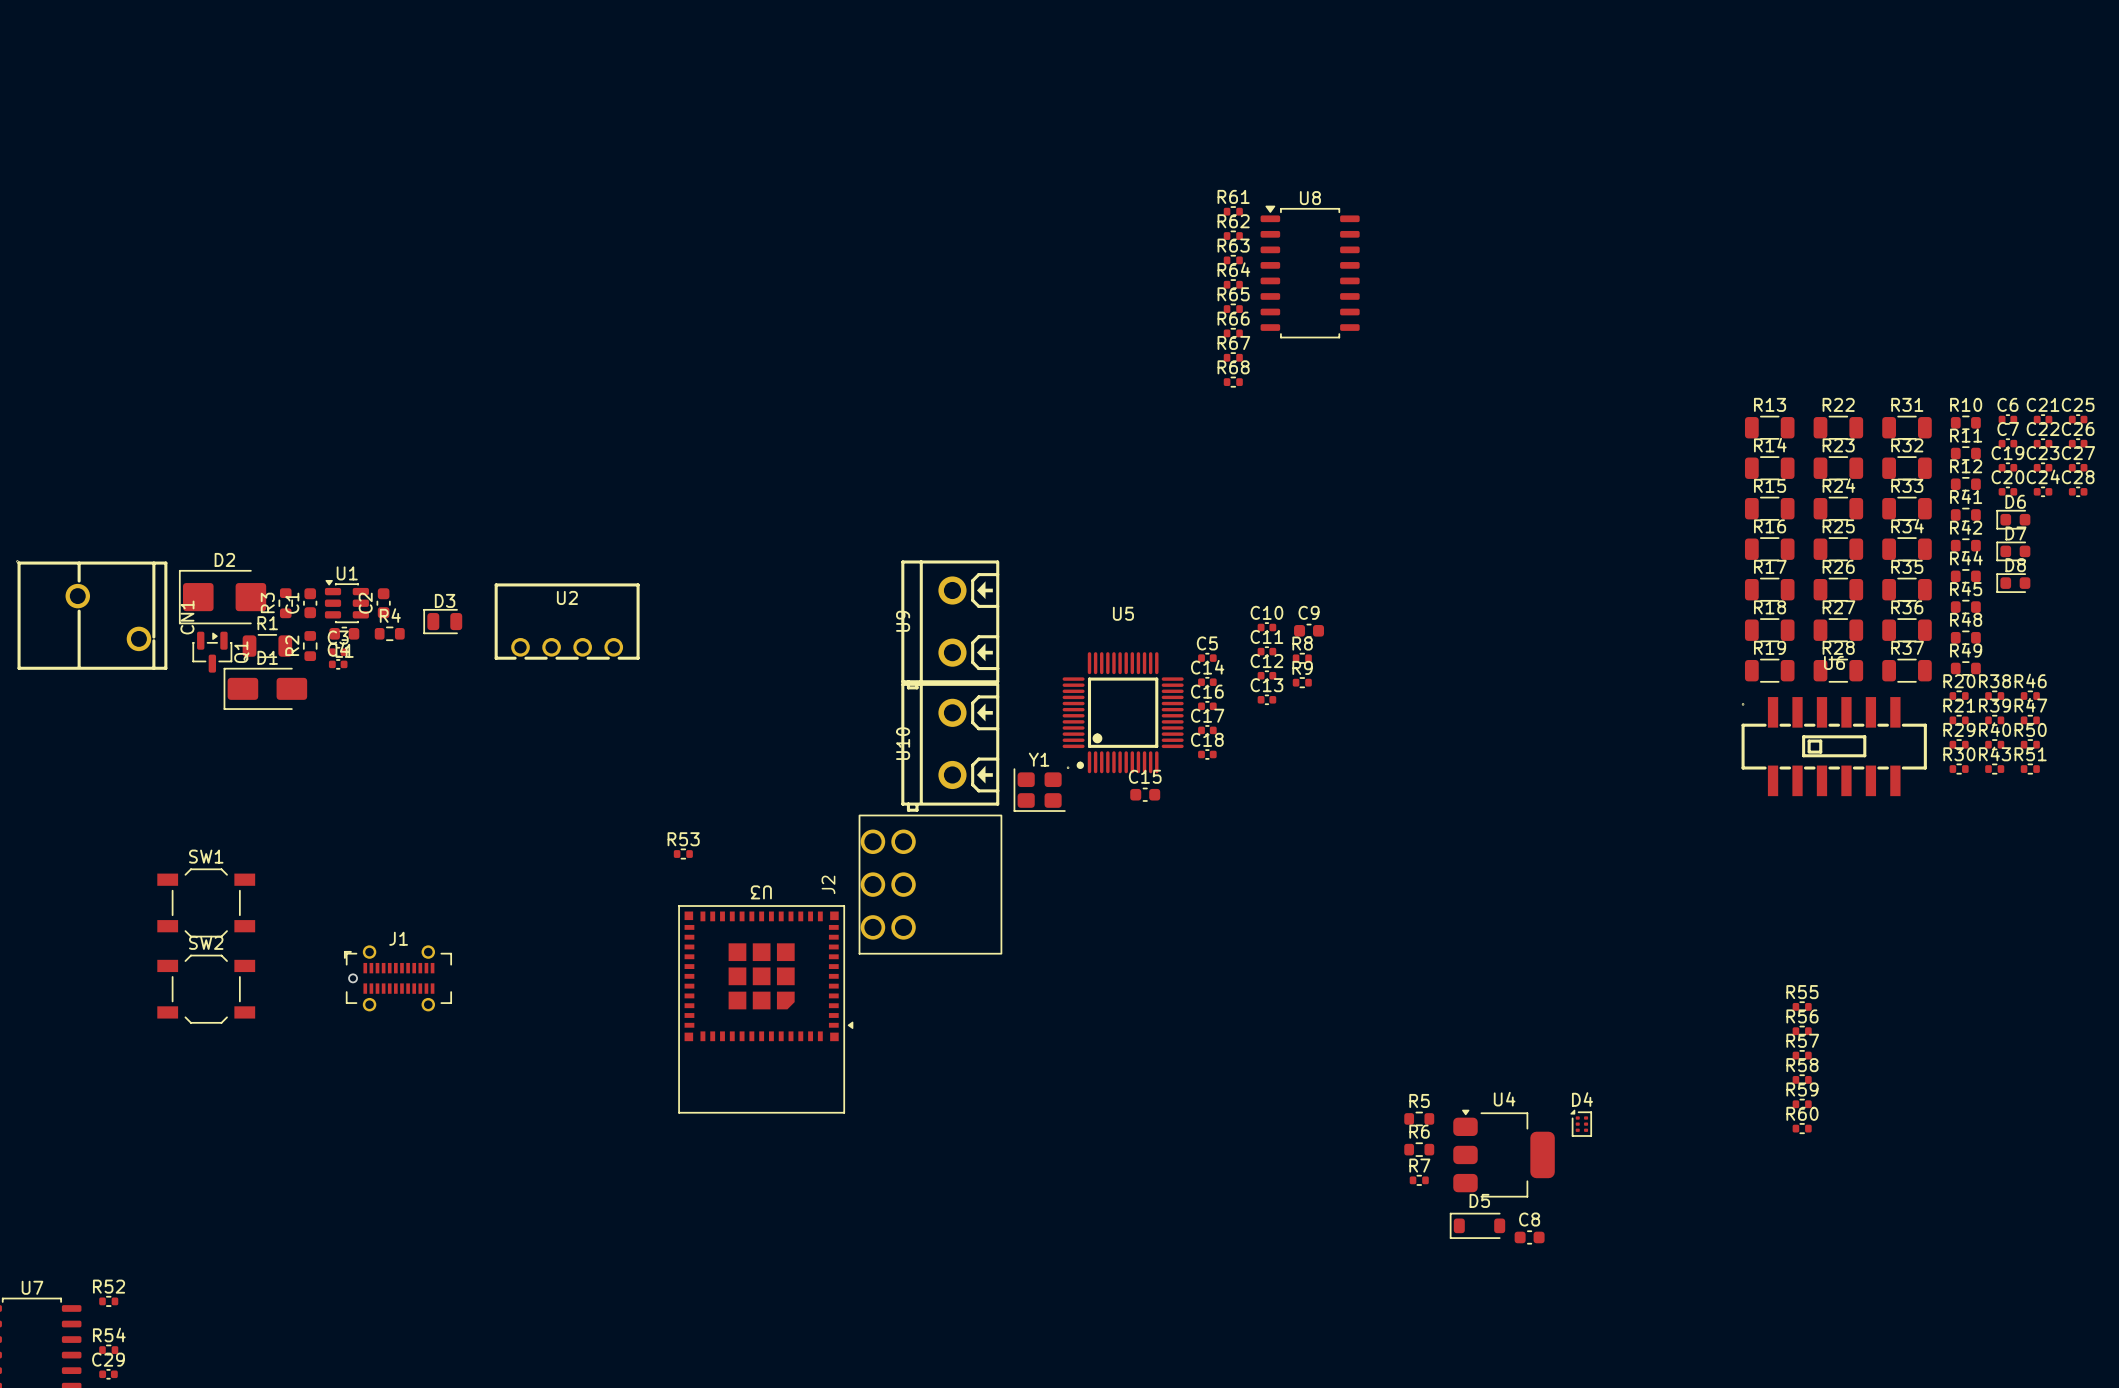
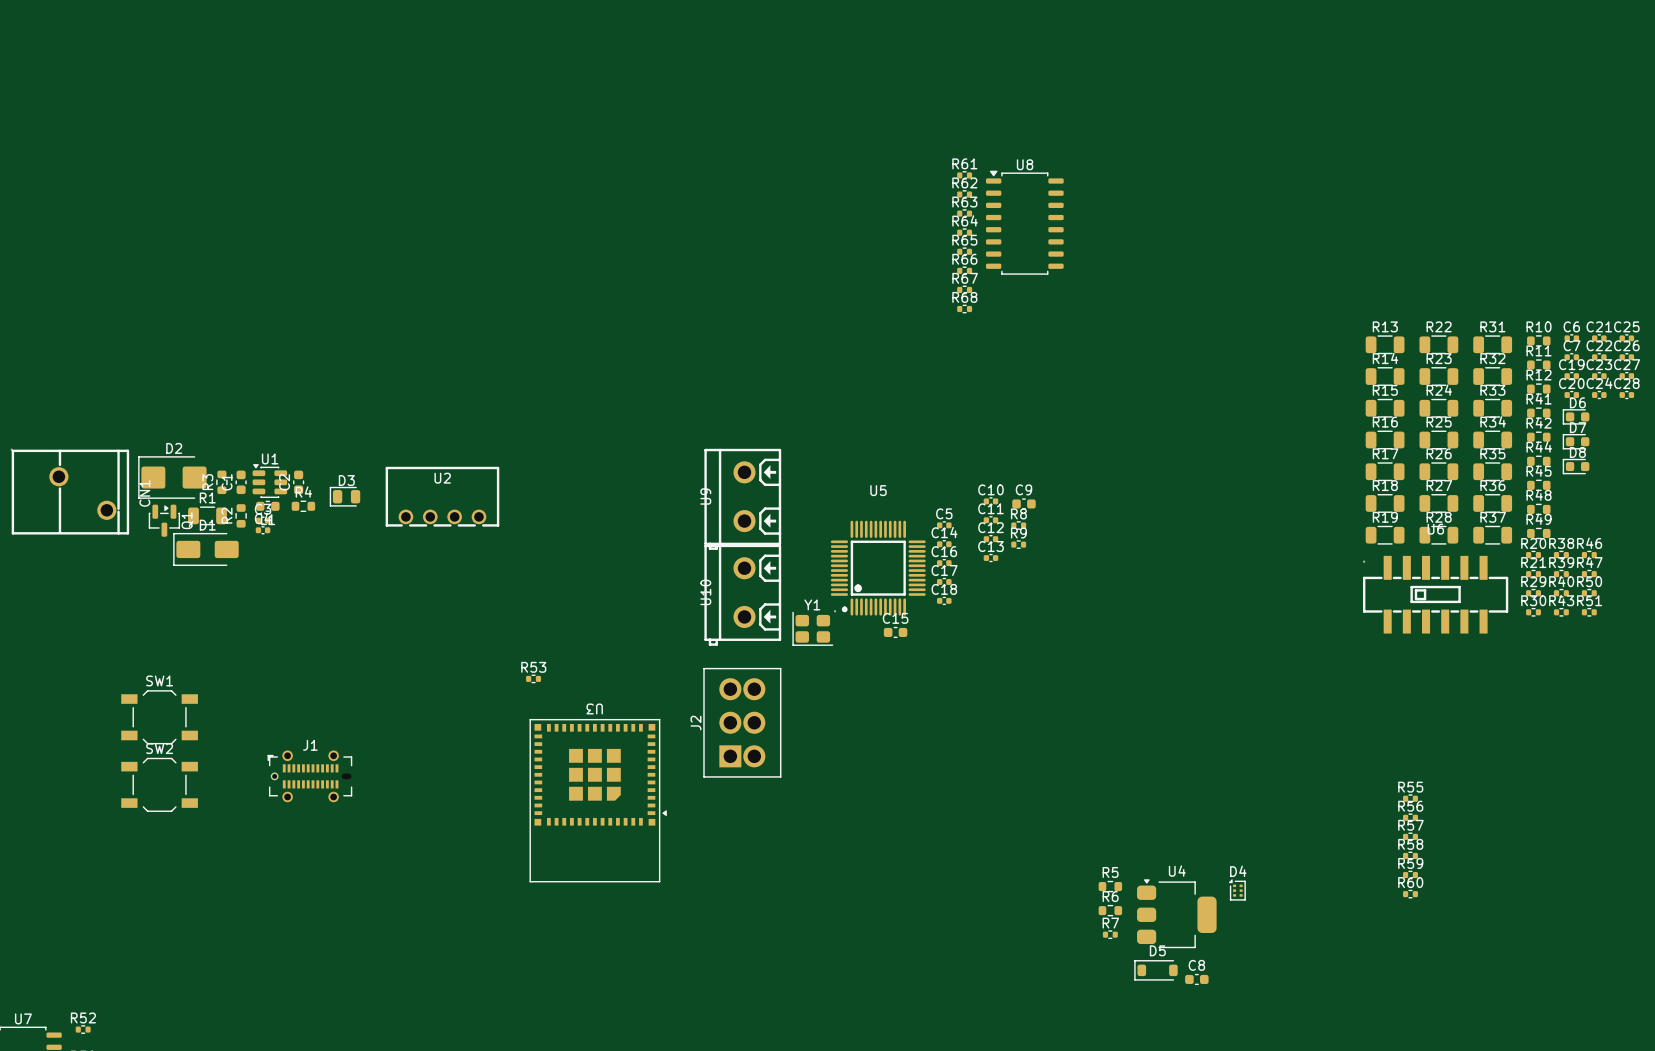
J2 footprint: [858, 814, 1003, 955] -> [703, 667, 782, 778]
J2 name position: J2 (828, 884) -> J2 (695, 723)

